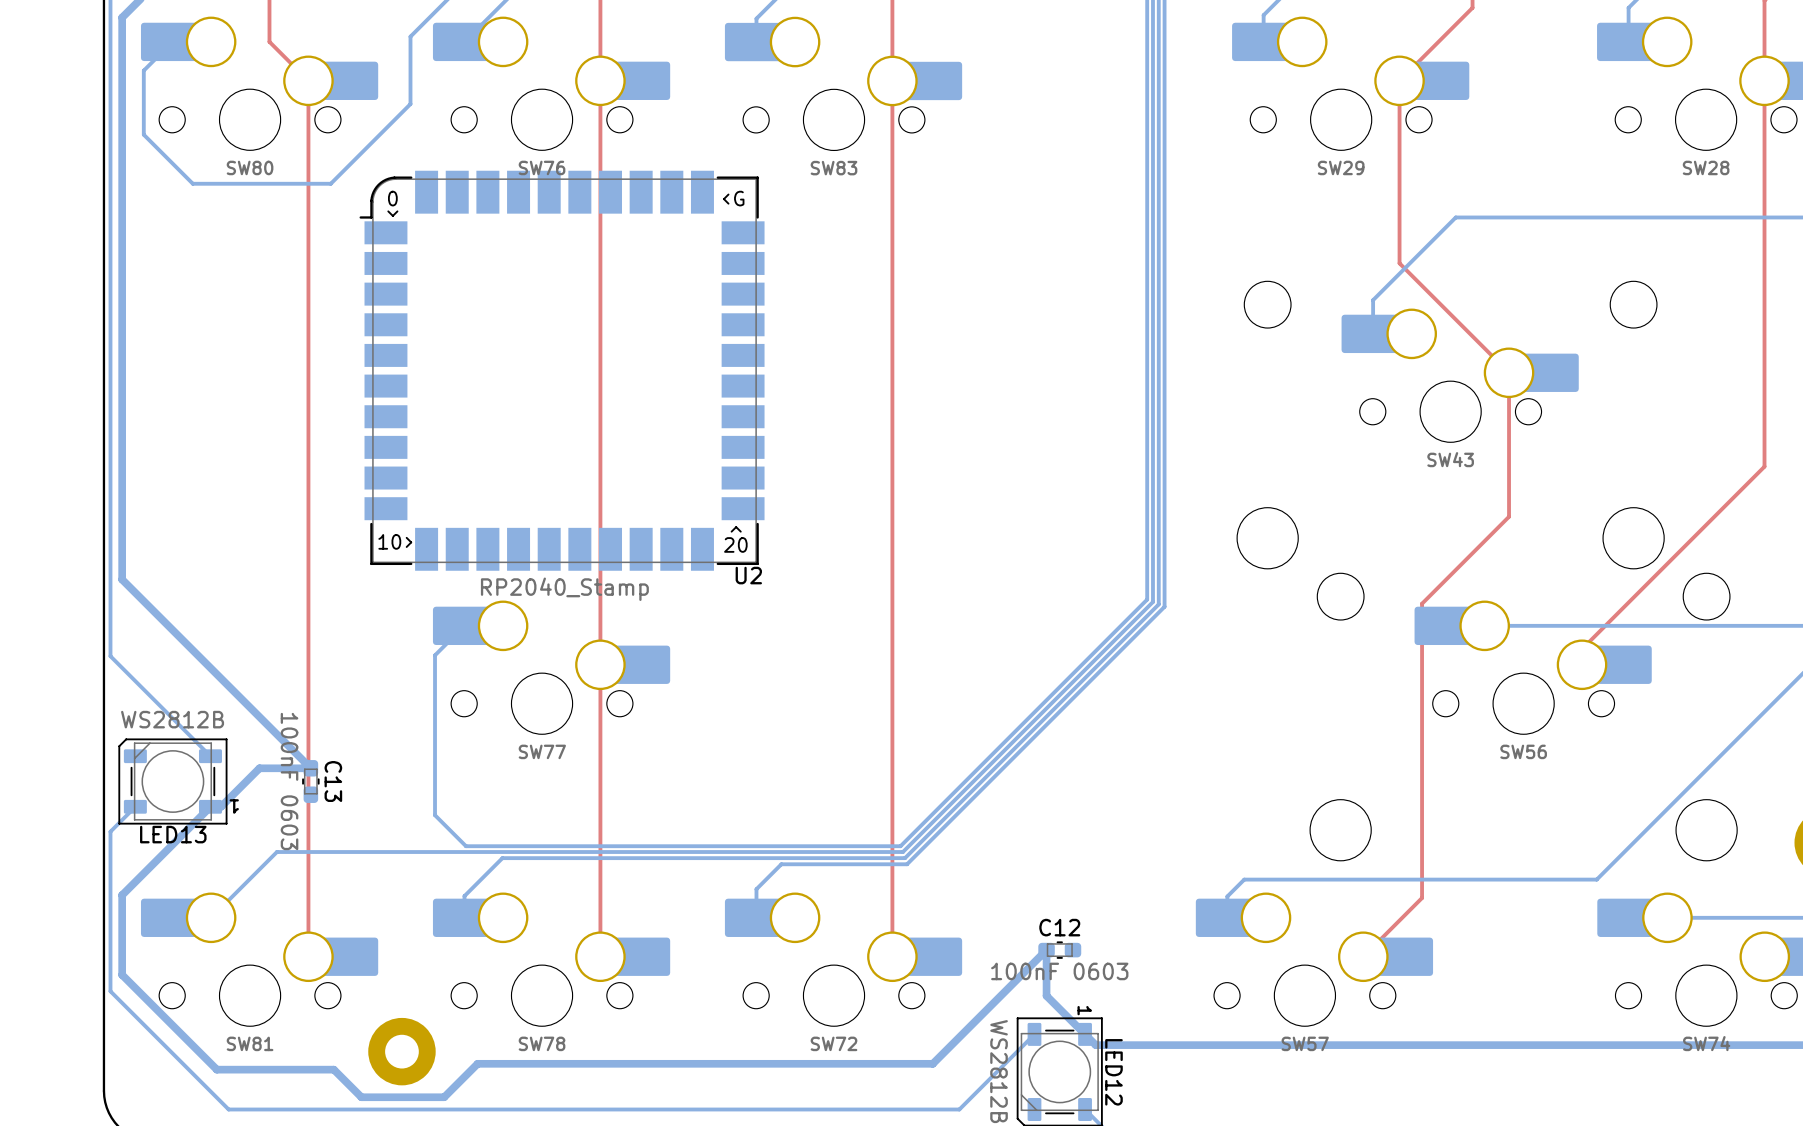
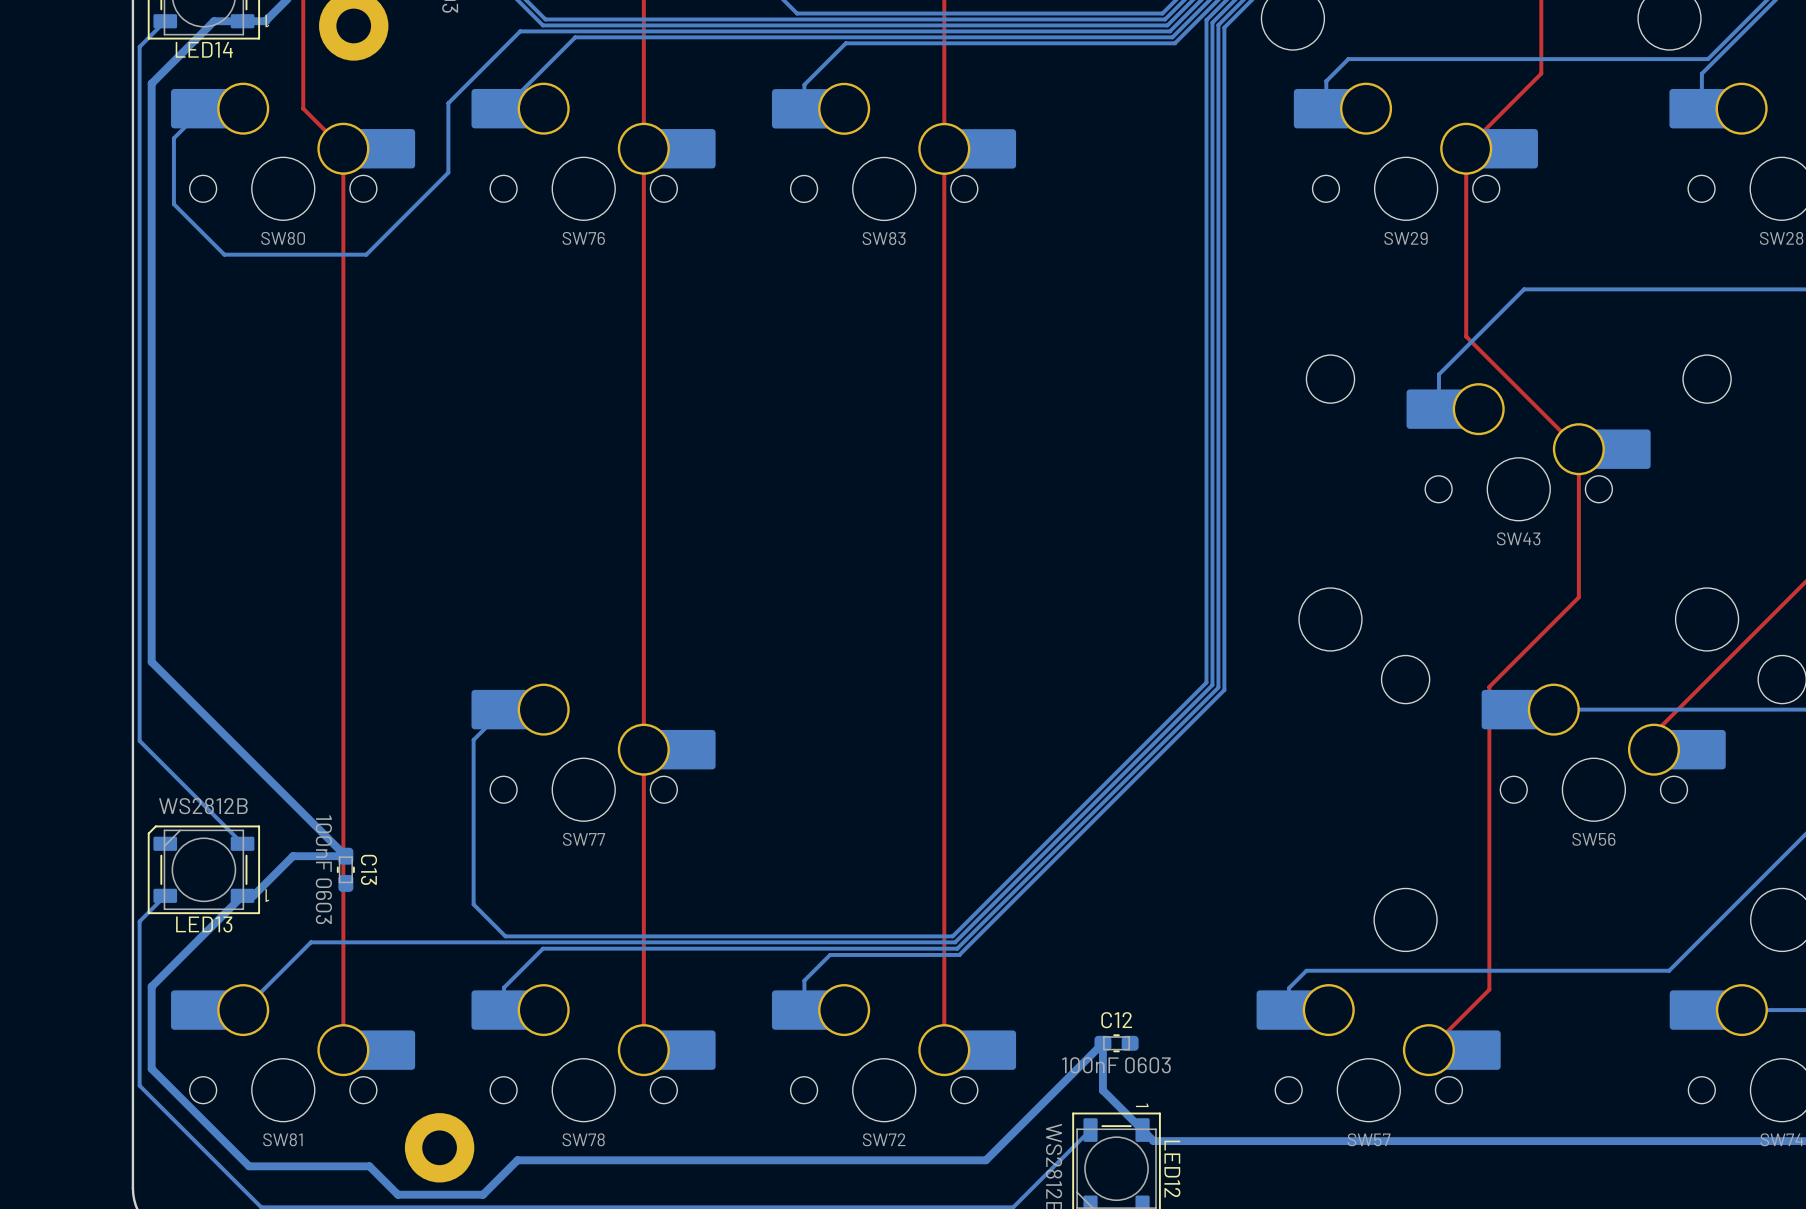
U2: RP2040_Stamp (562, 370) -> none

